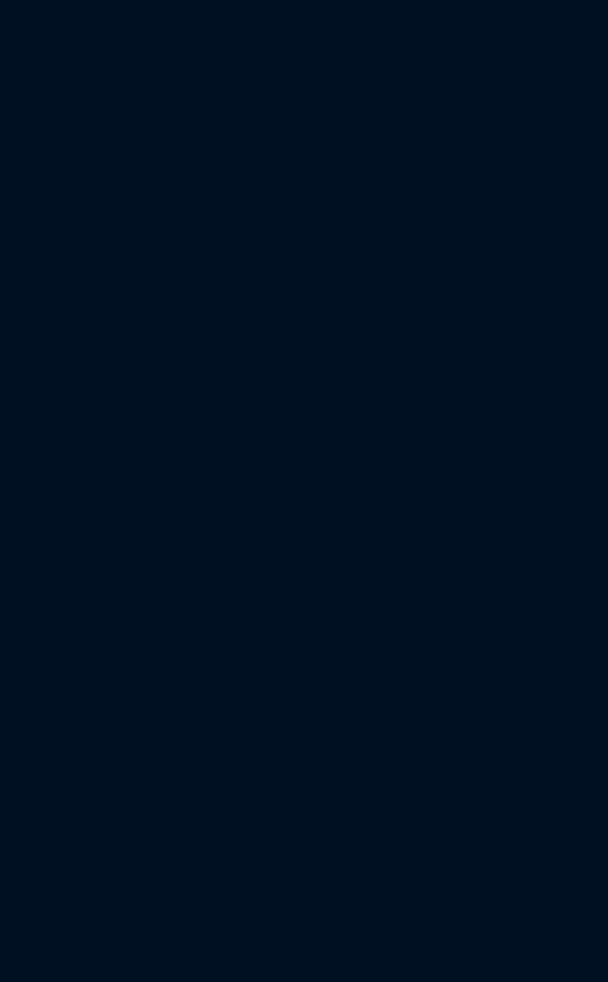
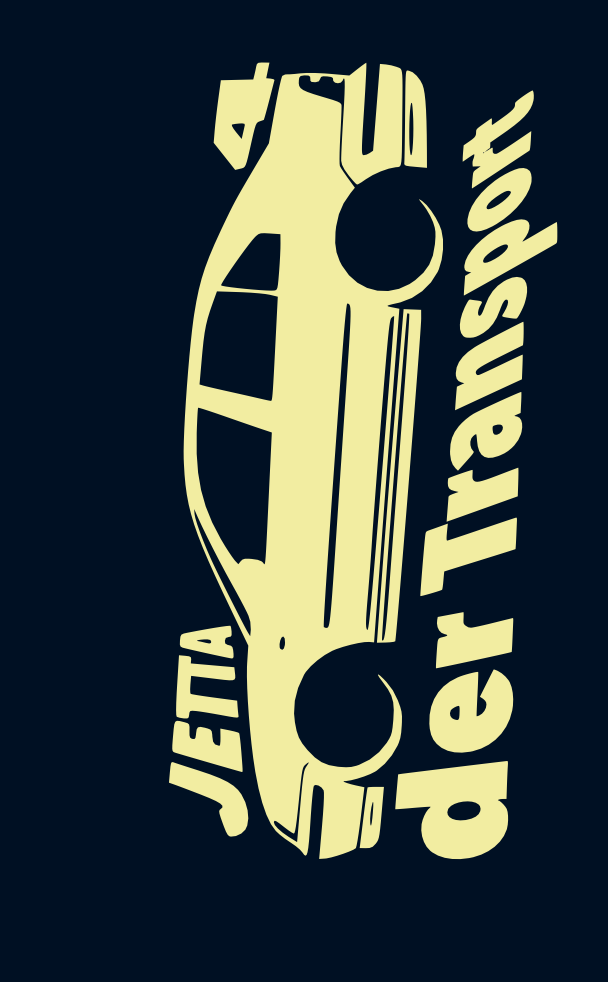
drawing: none -> [168, 62, 558, 860]

